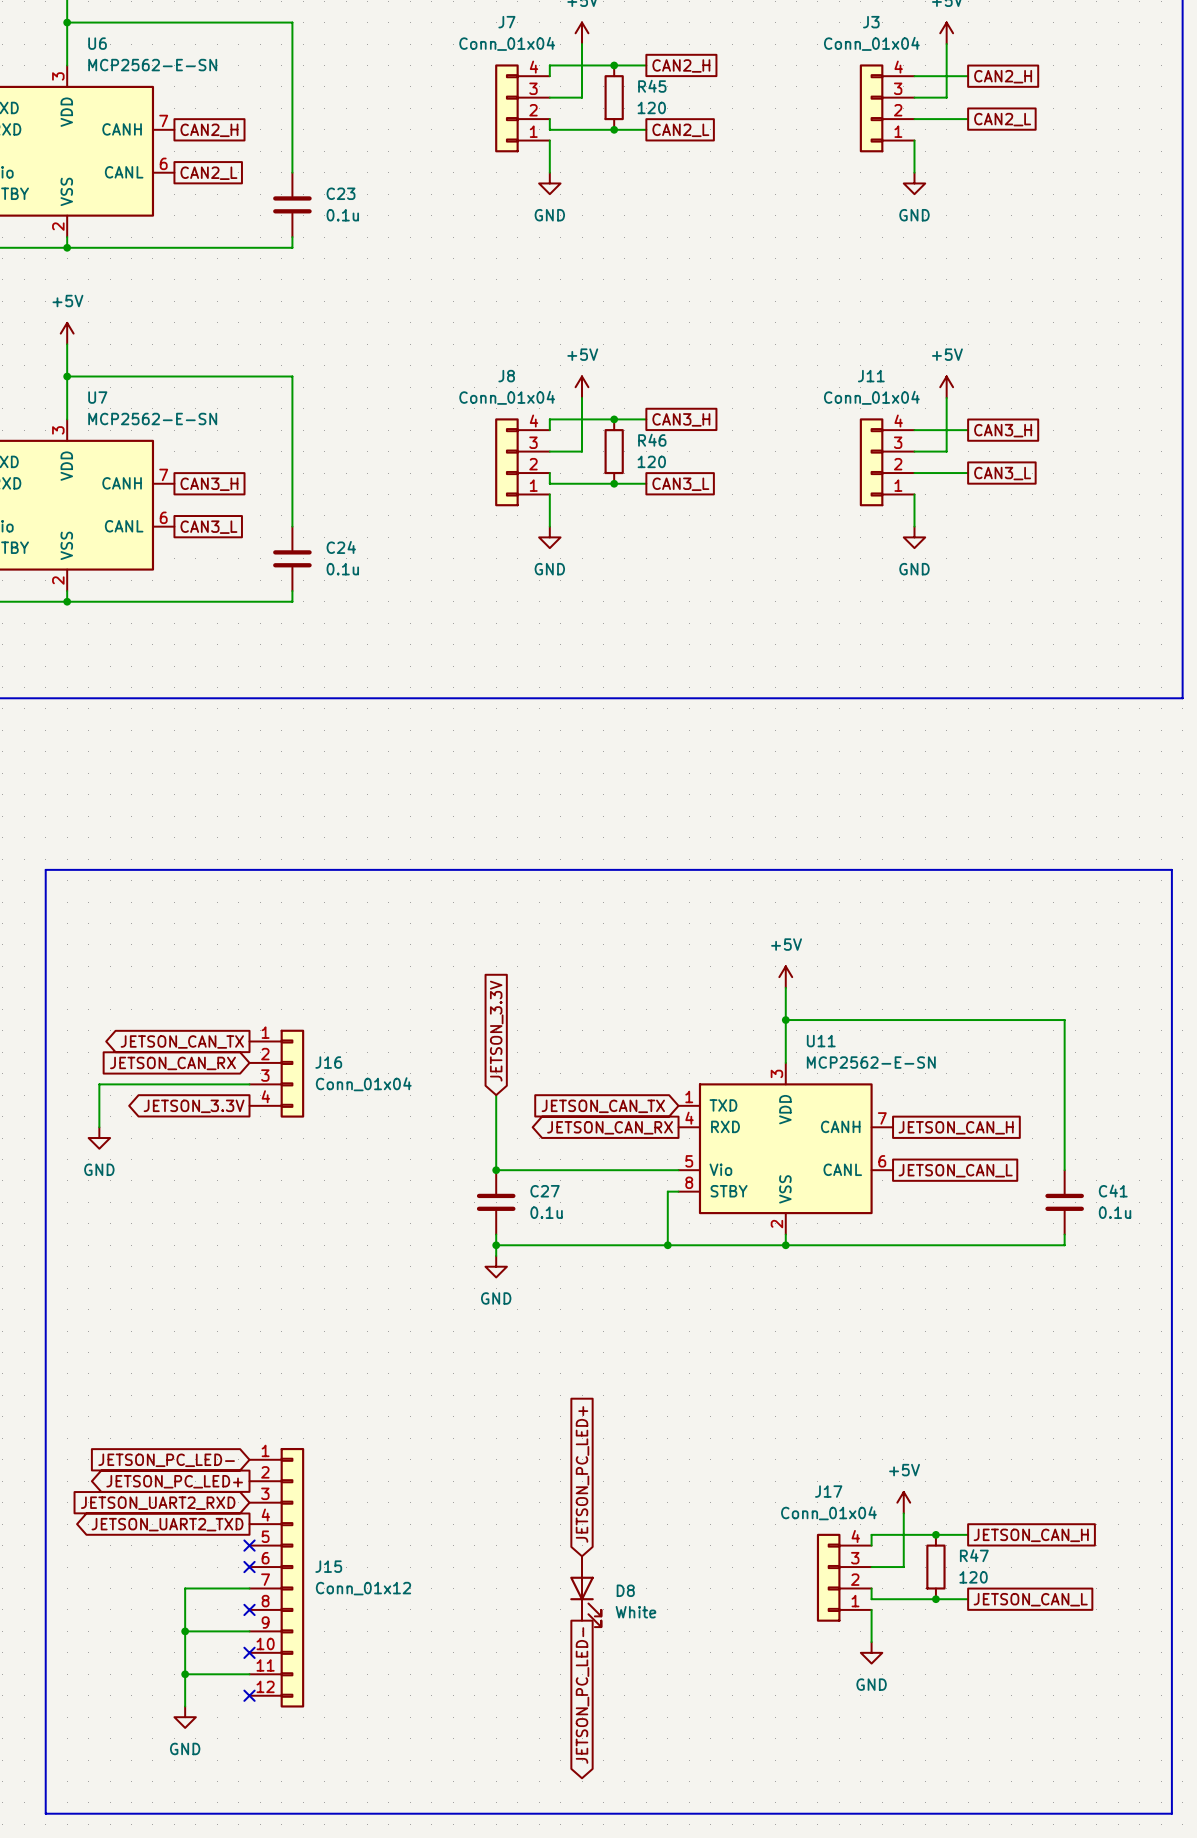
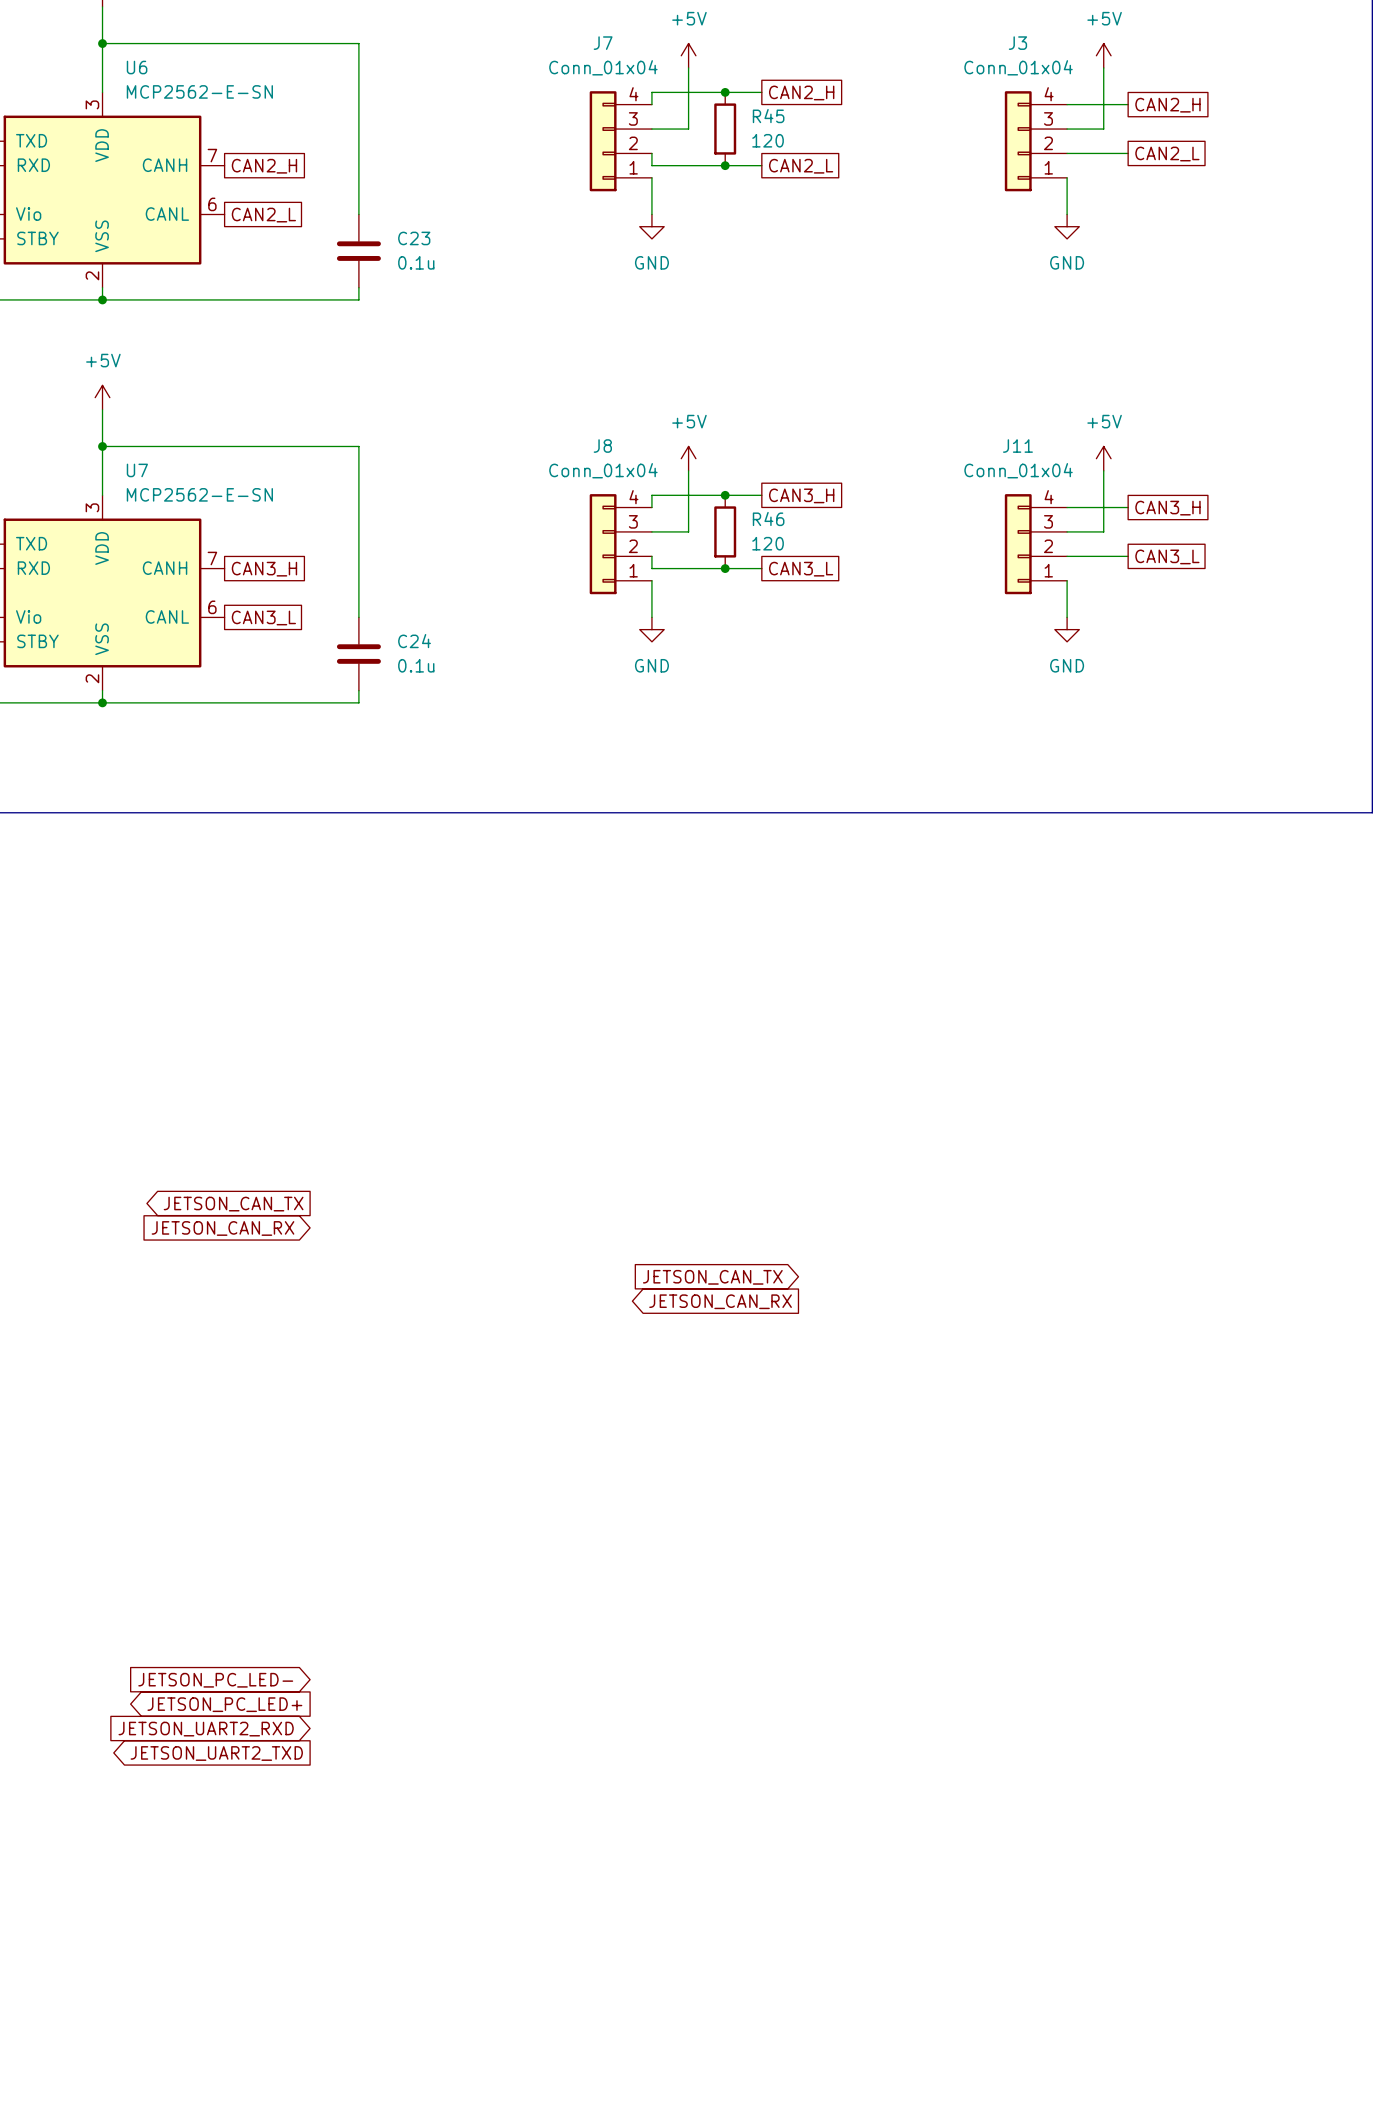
line: (45, 869) (1171, 869) (1171, 1813) (45, 1813) (45, 869) -> none
power symbol: +5V (785, 977) -> none
wire: (785, 987) (785, 1062) -> none
wire: (785, 1020) (1064, 1020) (1064, 1170) -> none
junction: (785, 1020) -> none
global label: JETSON_3.3V (496, 1031) -> none
J16: Conn_01x04 (276, 1073) -> none
wire: (249, 1084) (99, 1084) (99, 1127) -> none
wire: (496, 1095) (496, 1170) (678, 1170) -> none
global label: JETSON_3.3V (194, 1106) -> none
global label: JETSON_CAN_H (956, 1127) -> none
power symbol: GND (99, 1138) -> none
U11: MCP2562-E-SN (785, 1148) -> none
junction: (496, 1170) -> none
global label: JETSON_CAN_L (955, 1170) -> none
wire: (678, 1191) (667, 1191) (667, 1245) -> none
C27: 0.1u (496, 1202) -> none
C41: 0.1u (1064, 1202) -> none
wire: (496, 1234) (496, 1255) -> none
wire: (785, 1234) (785, 1245) -> none
wire: (1064, 1234) (1064, 1245) (496, 1245) -> none
junction: (496, 1245) -> none
junction: (667, 1245) -> none
junction: (785, 1245) -> none
power symbol: GND (496, 1266) -> none
global label: JETSON_PC_LED+ (582, 1474) -> none
power symbol: +5V (903, 1502) -> none
wire: (903, 1513) (903, 1567) (871, 1567) -> none
junction: (935, 1534) -> none
wire: (968, 1534) (871, 1534) (871, 1545) -> none
global label: JETSON_CAN_H (1031, 1535) -> none
no-connect mark: (249, 1545) -> none
no-connect mark: (249, 1567) -> none
R47: 120 (935, 1567) -> none
J15: Conn_01x12 (276, 1577) -> none
J17: Conn_01x04 (844, 1577) -> none
wire: (249, 1588) (185, 1588) (185, 1706) -> none
wire: (871, 1588) (871, 1599) (968, 1599) -> none
D8: White (585, 1591) -> none
junction: (935, 1599) -> none
global label: JETSON_CAN_L (1030, 1599) -> none
no-connect mark: (249, 1609) -> none
wire: (871, 1609) (871, 1642) -> none
wire: (185, 1631) (249, 1631) -> none
junction: (185, 1631) -> none
no-connect mark: (249, 1652) -> none
power symbol: GND (871, 1652) -> none
wire: (185, 1674) (249, 1674) -> none
junction: (185, 1674) -> none
no-connect mark: (249, 1695) -> none
global label: JETSON_PC_LED- (582, 1695) -> none
power symbol: GND (185, 1717) -> none

